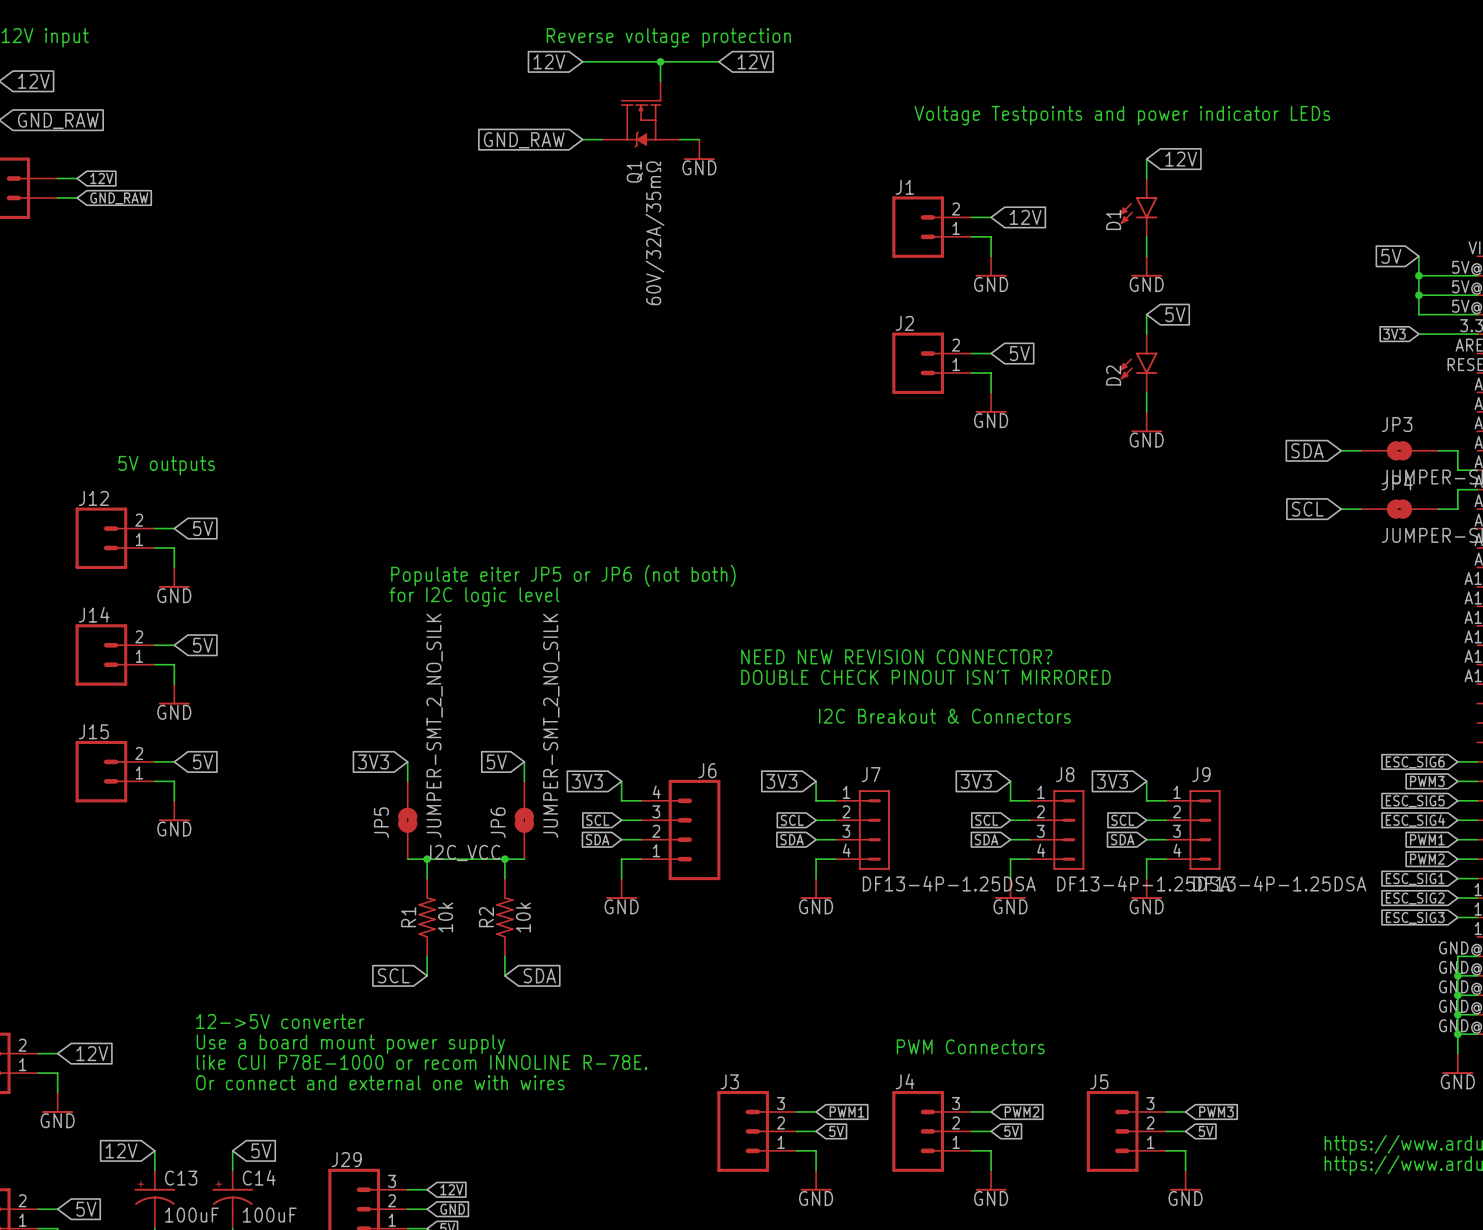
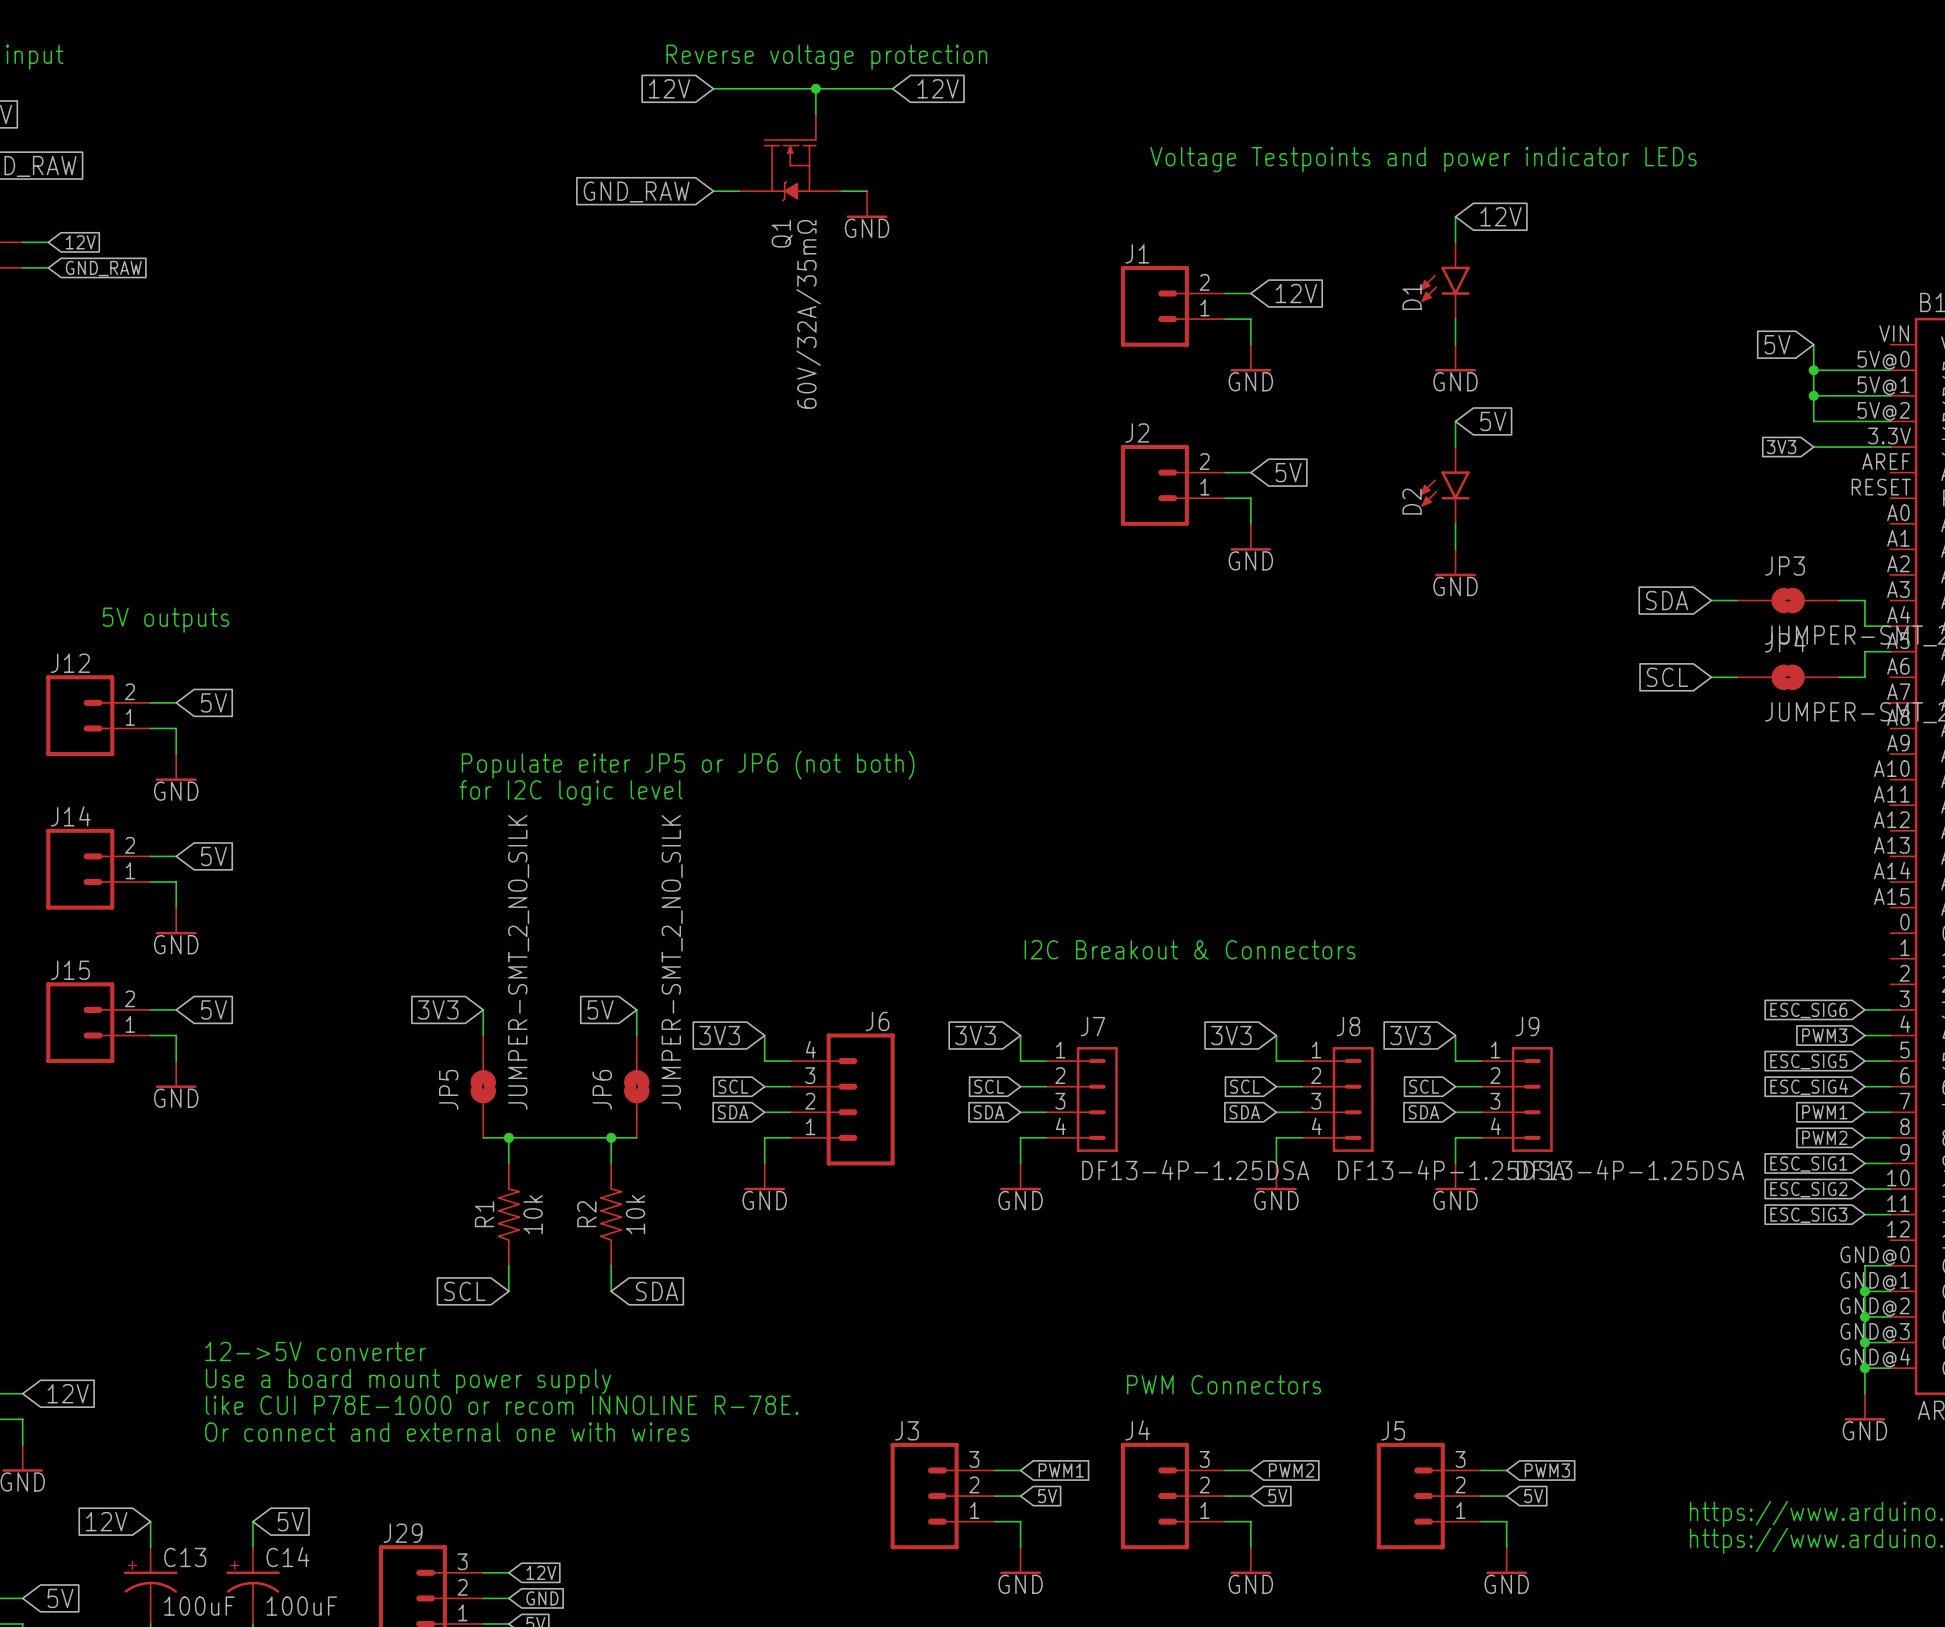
text: NEED NEW REVISION CONNECTOR? (896, 656) -> none
text: DOUBLE CHECK PINOUT ISN'T MIRRORED (925, 677) -> none
label: I2C_VCC (465, 853) -> none

